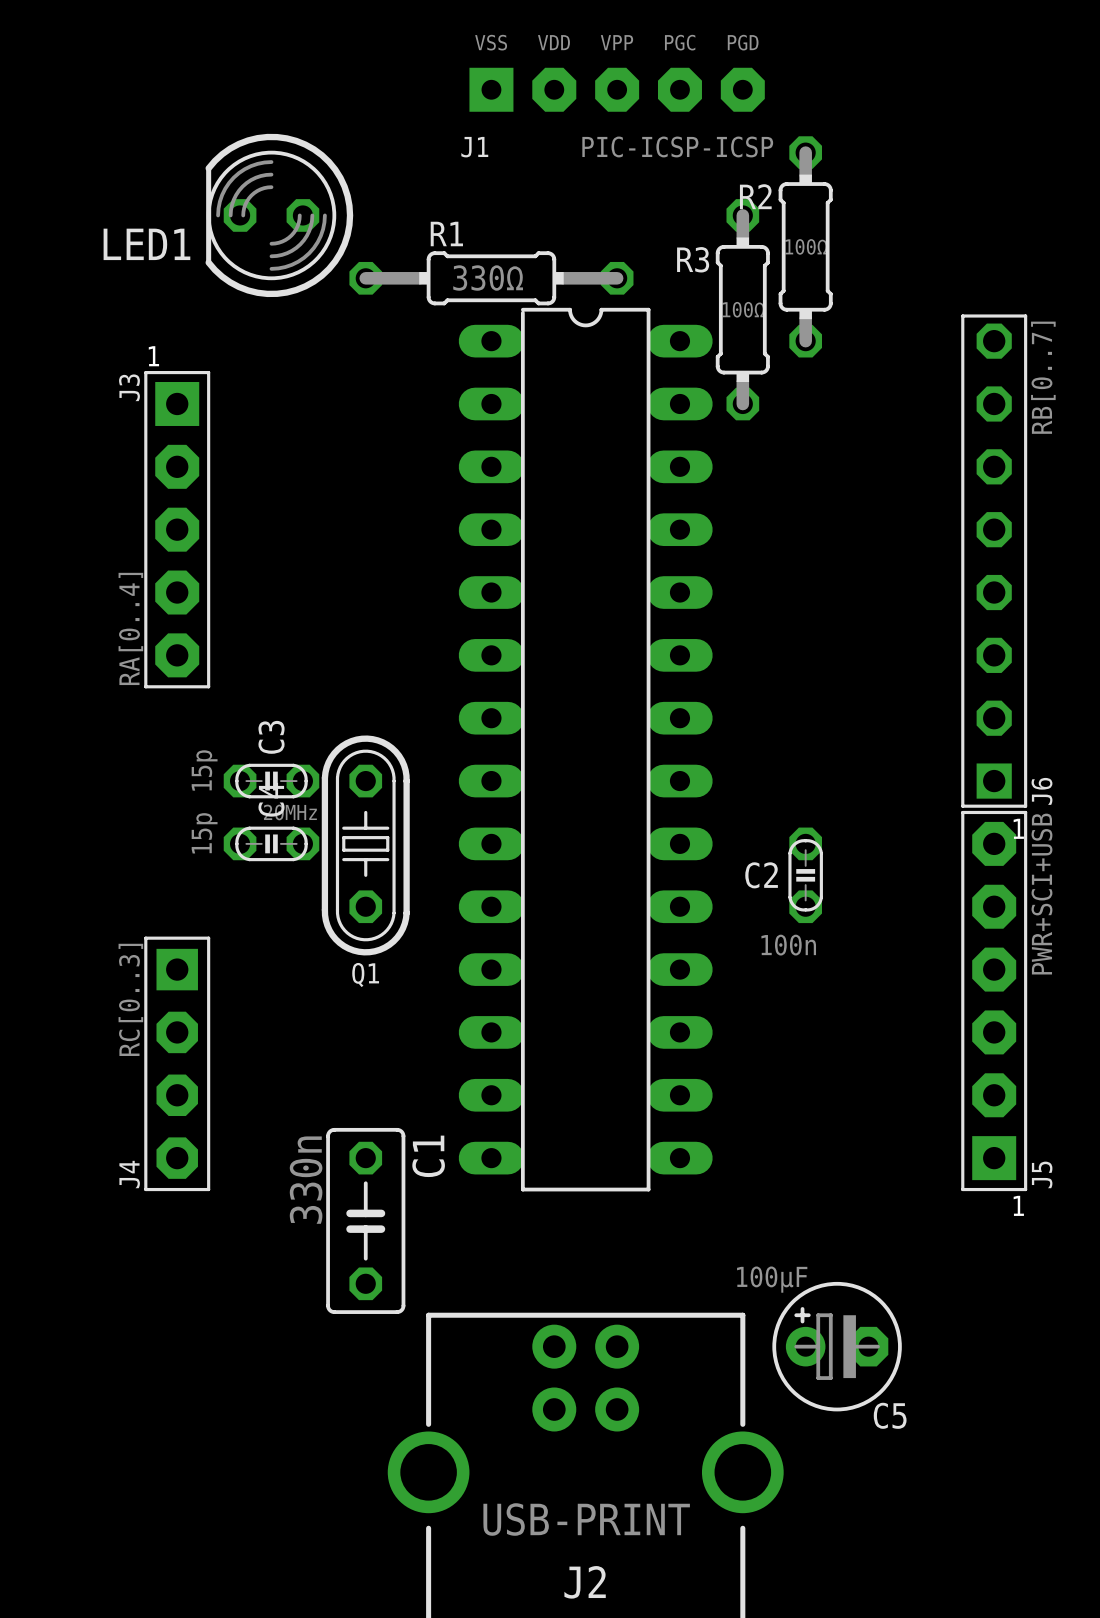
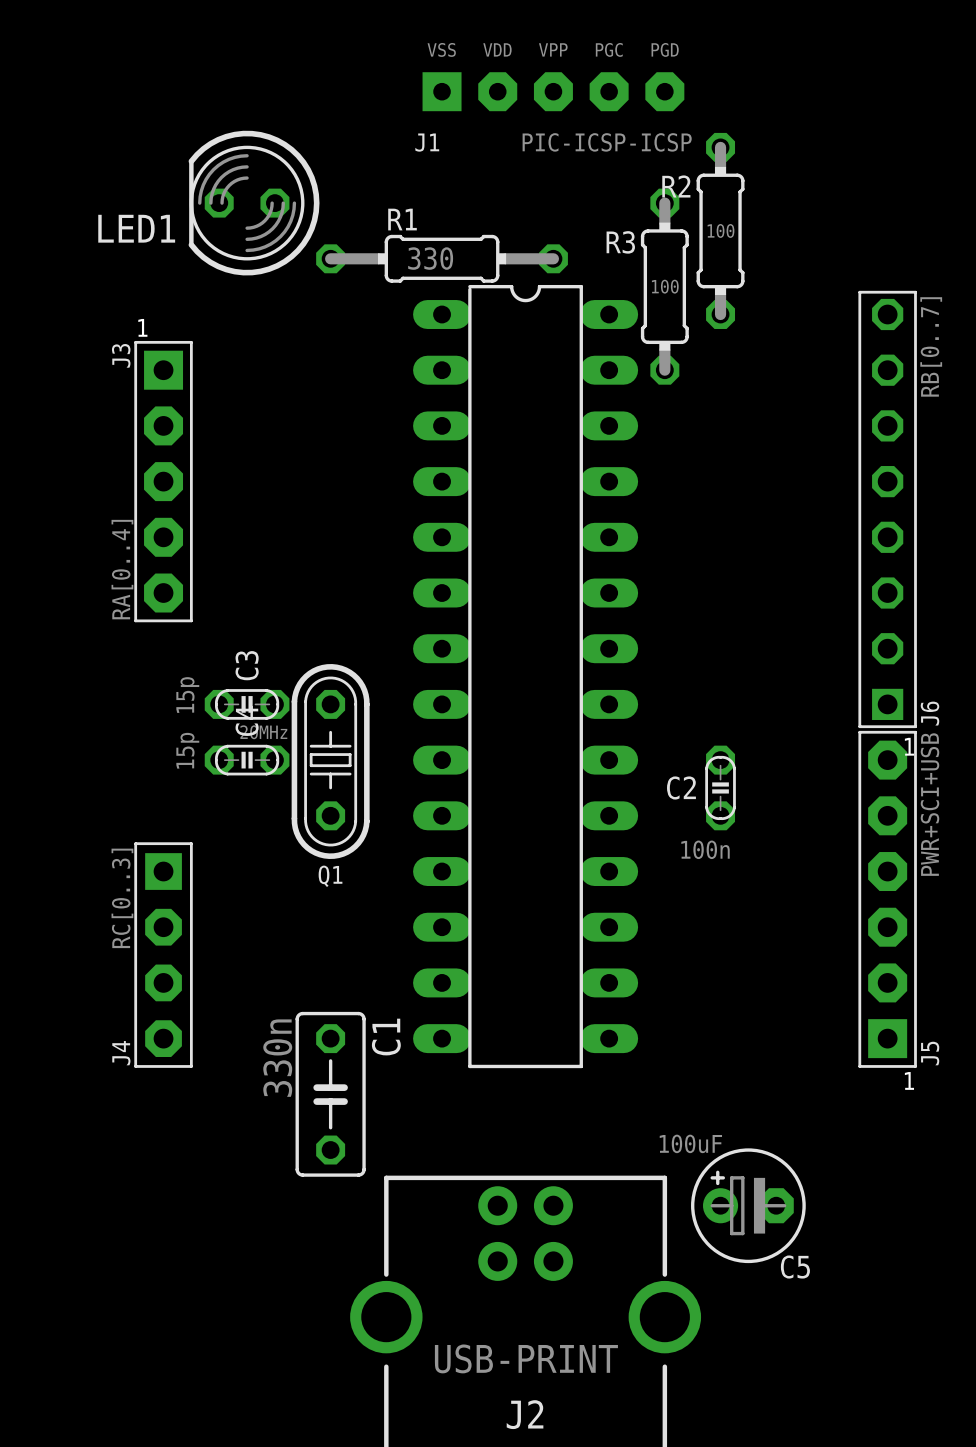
R2 value: 100Ω (806, 246) -> 100 (721, 230)
R1 value: 330Ω (488, 278) -> 330 (430, 258)
R3 value: 100Ω (743, 309) -> 100 (665, 286)
C5 value: 100μF (772, 1279) -> 100uF (690, 1143)

